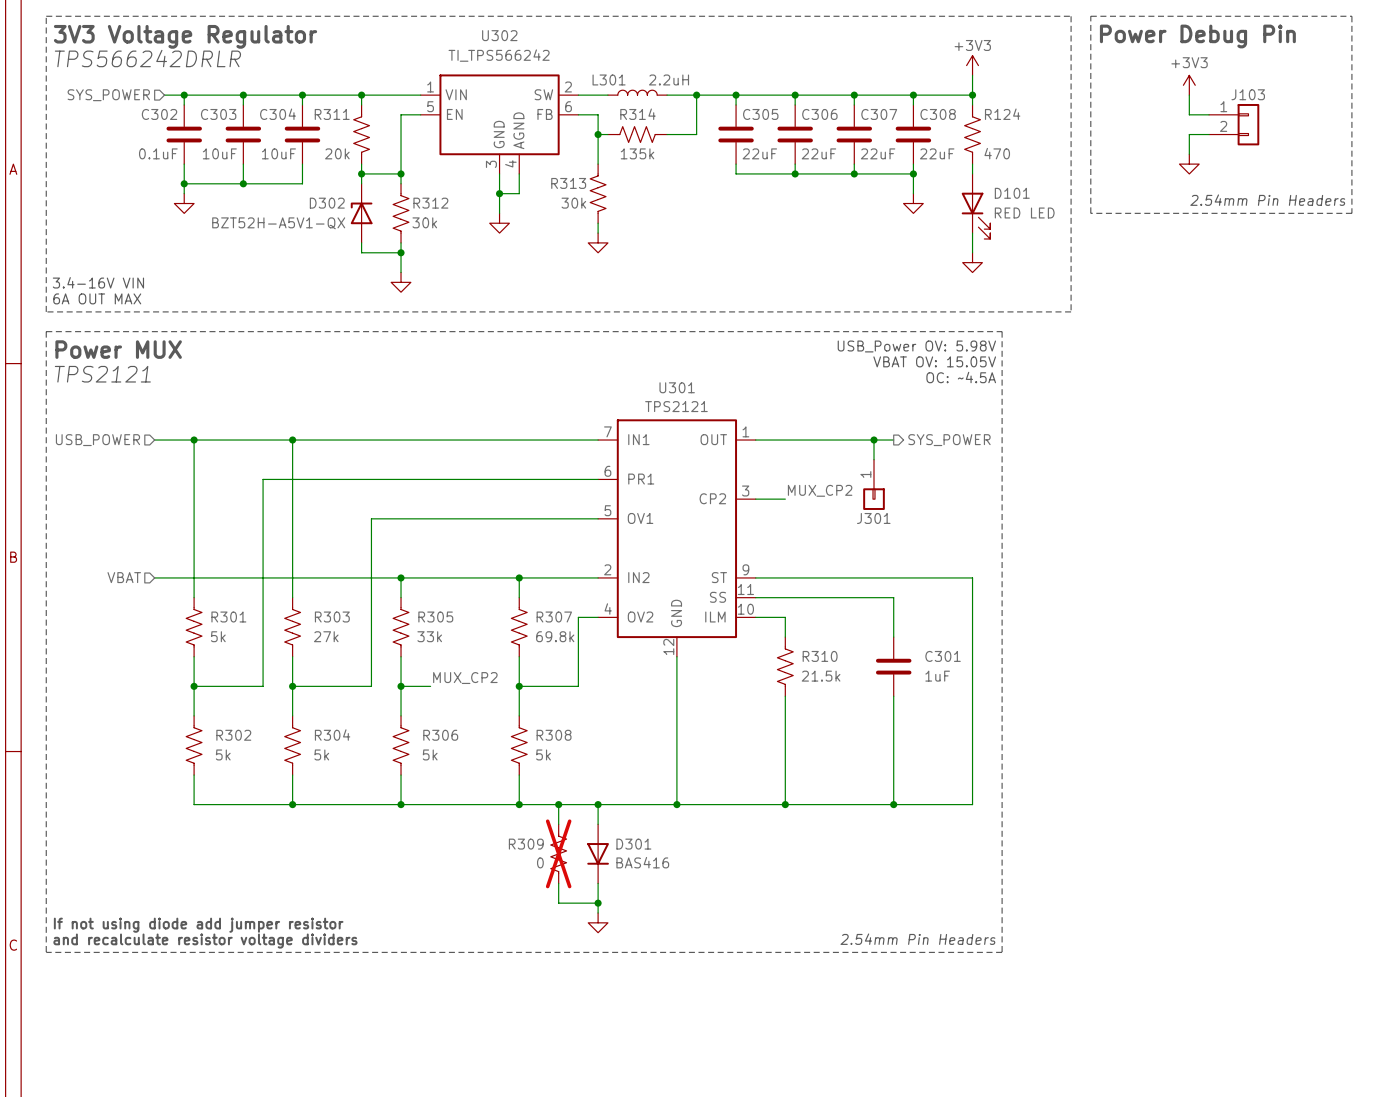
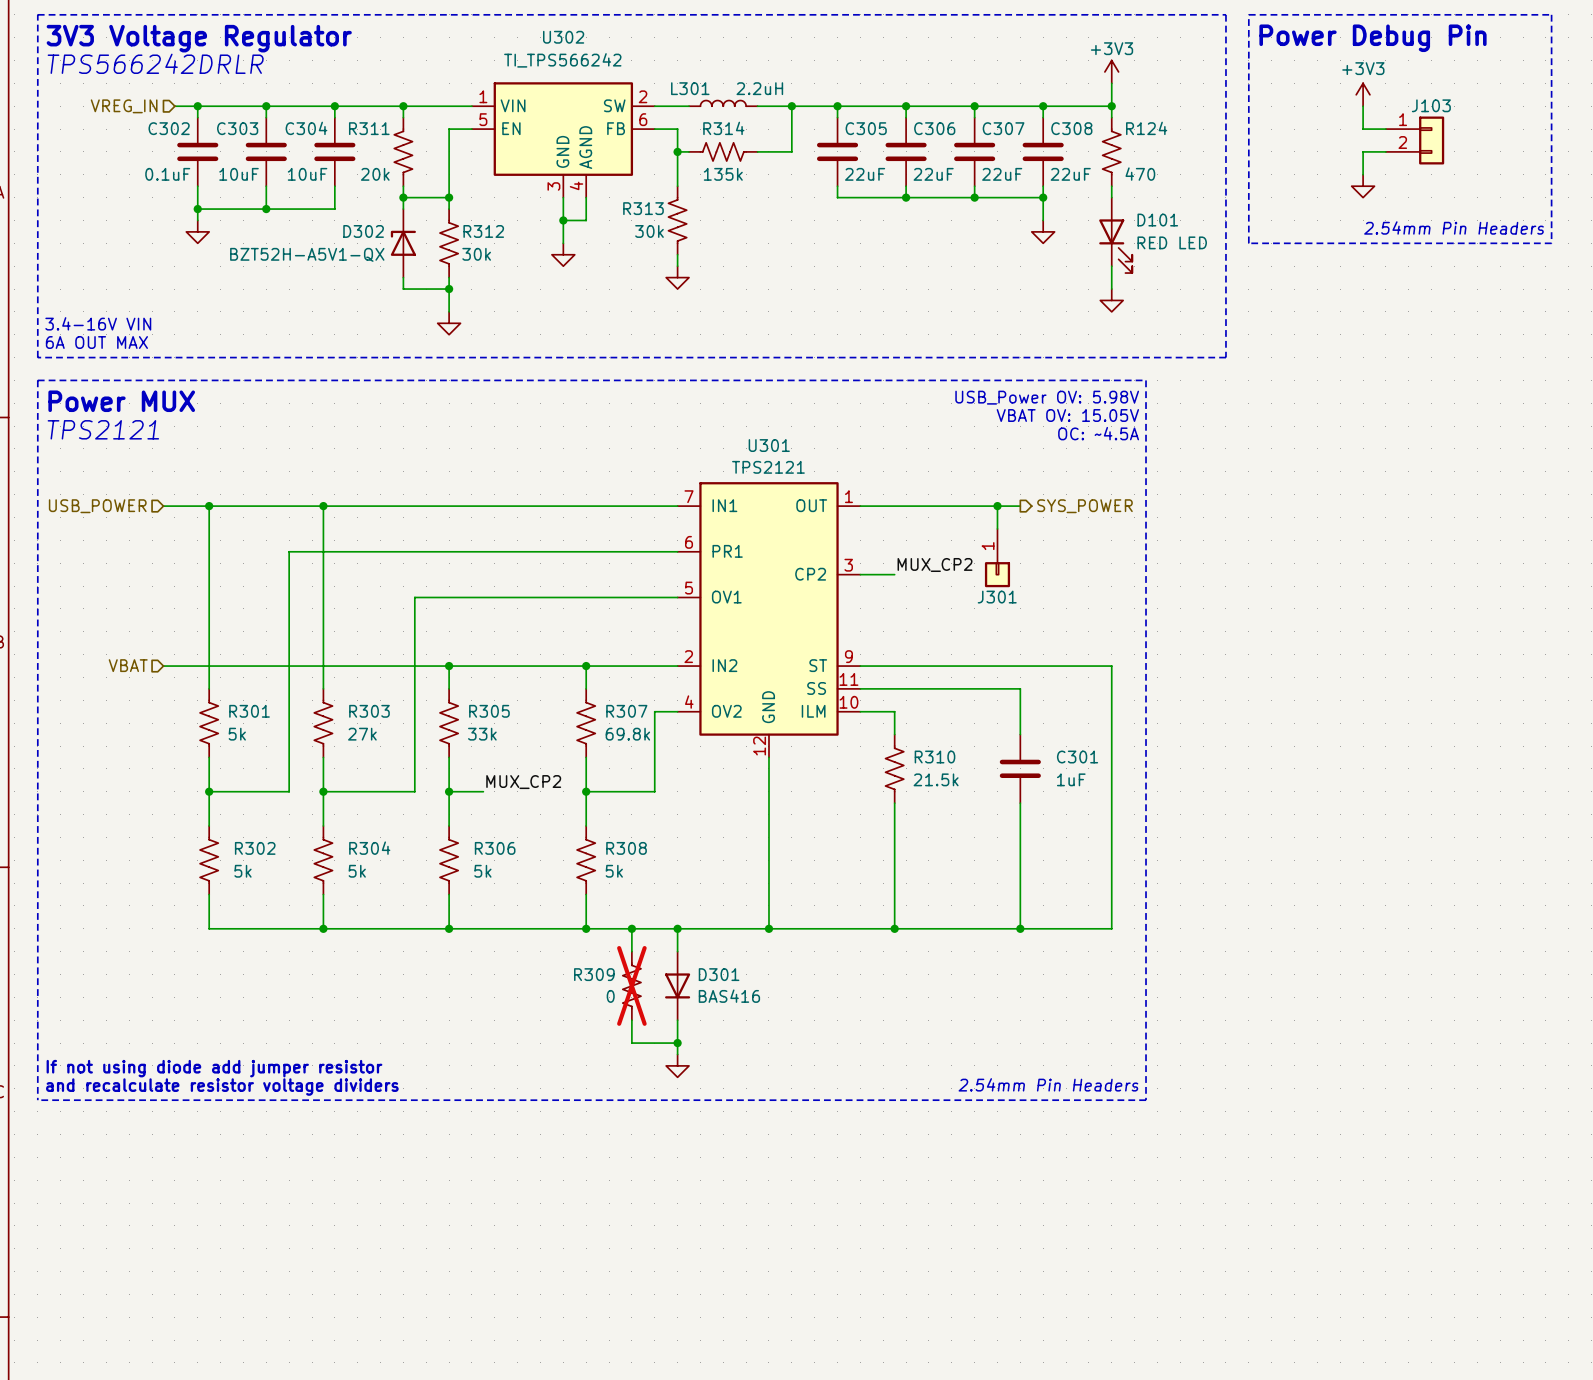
hierarchical label: SYS_POWER (108, 95) -> VREG_IN (124, 106)

